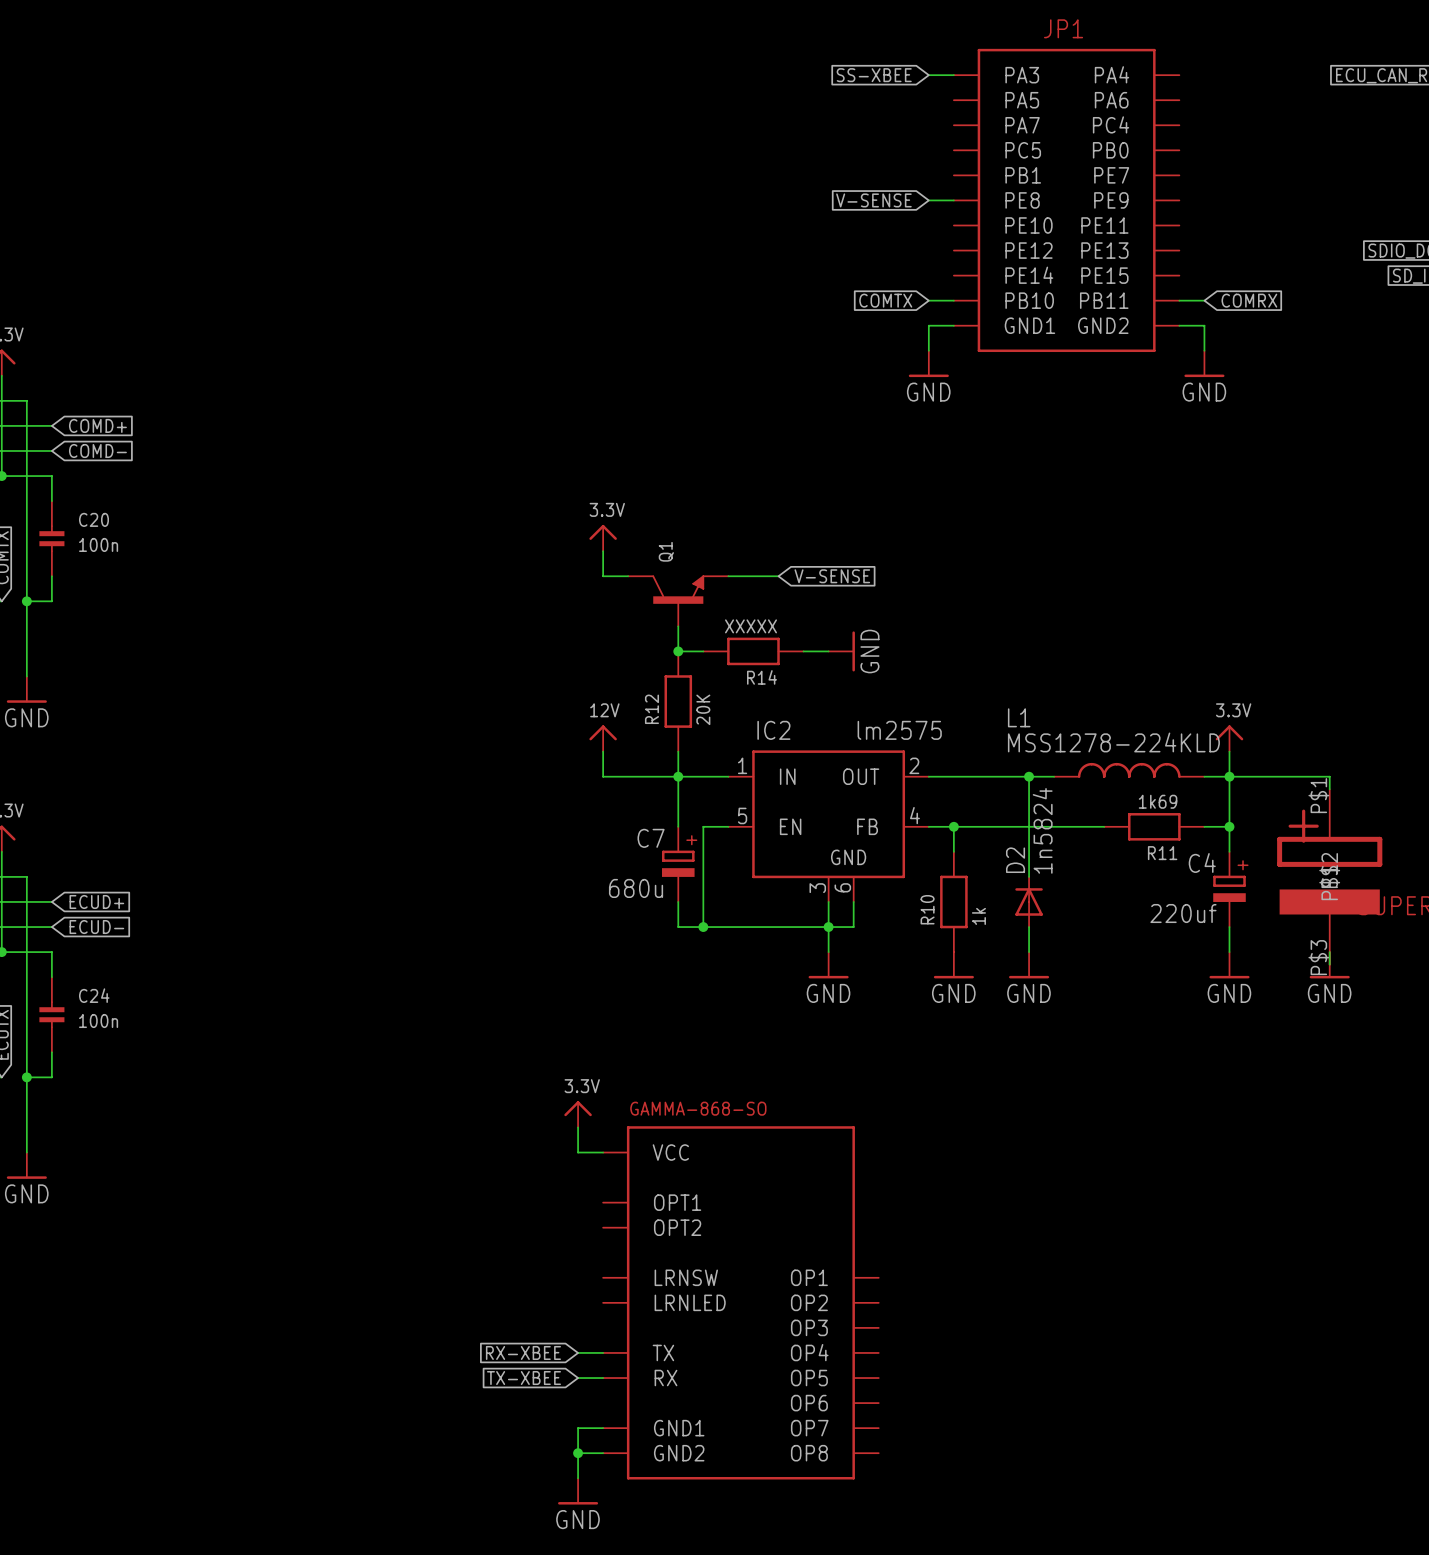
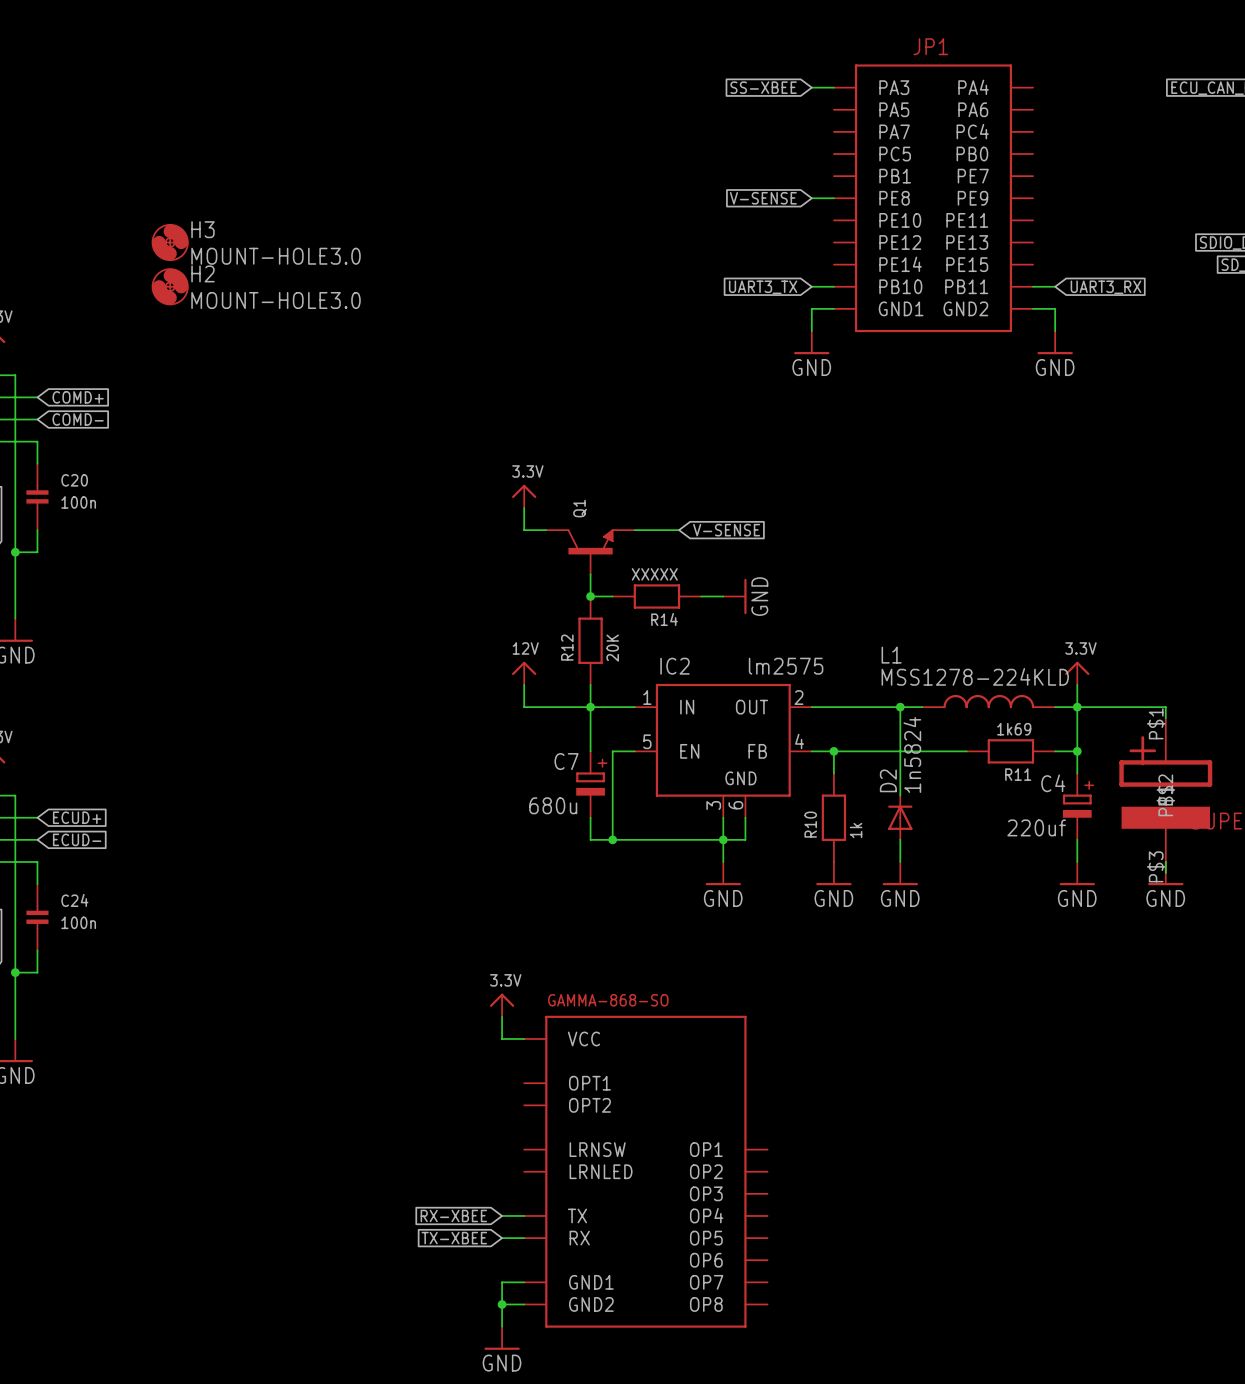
H3: none -> MOUNT-HOLE3.0 (170, 242)
H2: none -> MOUNT-HOLE3.0 (170, 286)
global label: COMTX (885, 300) -> UART3_TX (763, 287)
global label: COMRX (1249, 300) -> UART3_RX (1106, 287)

